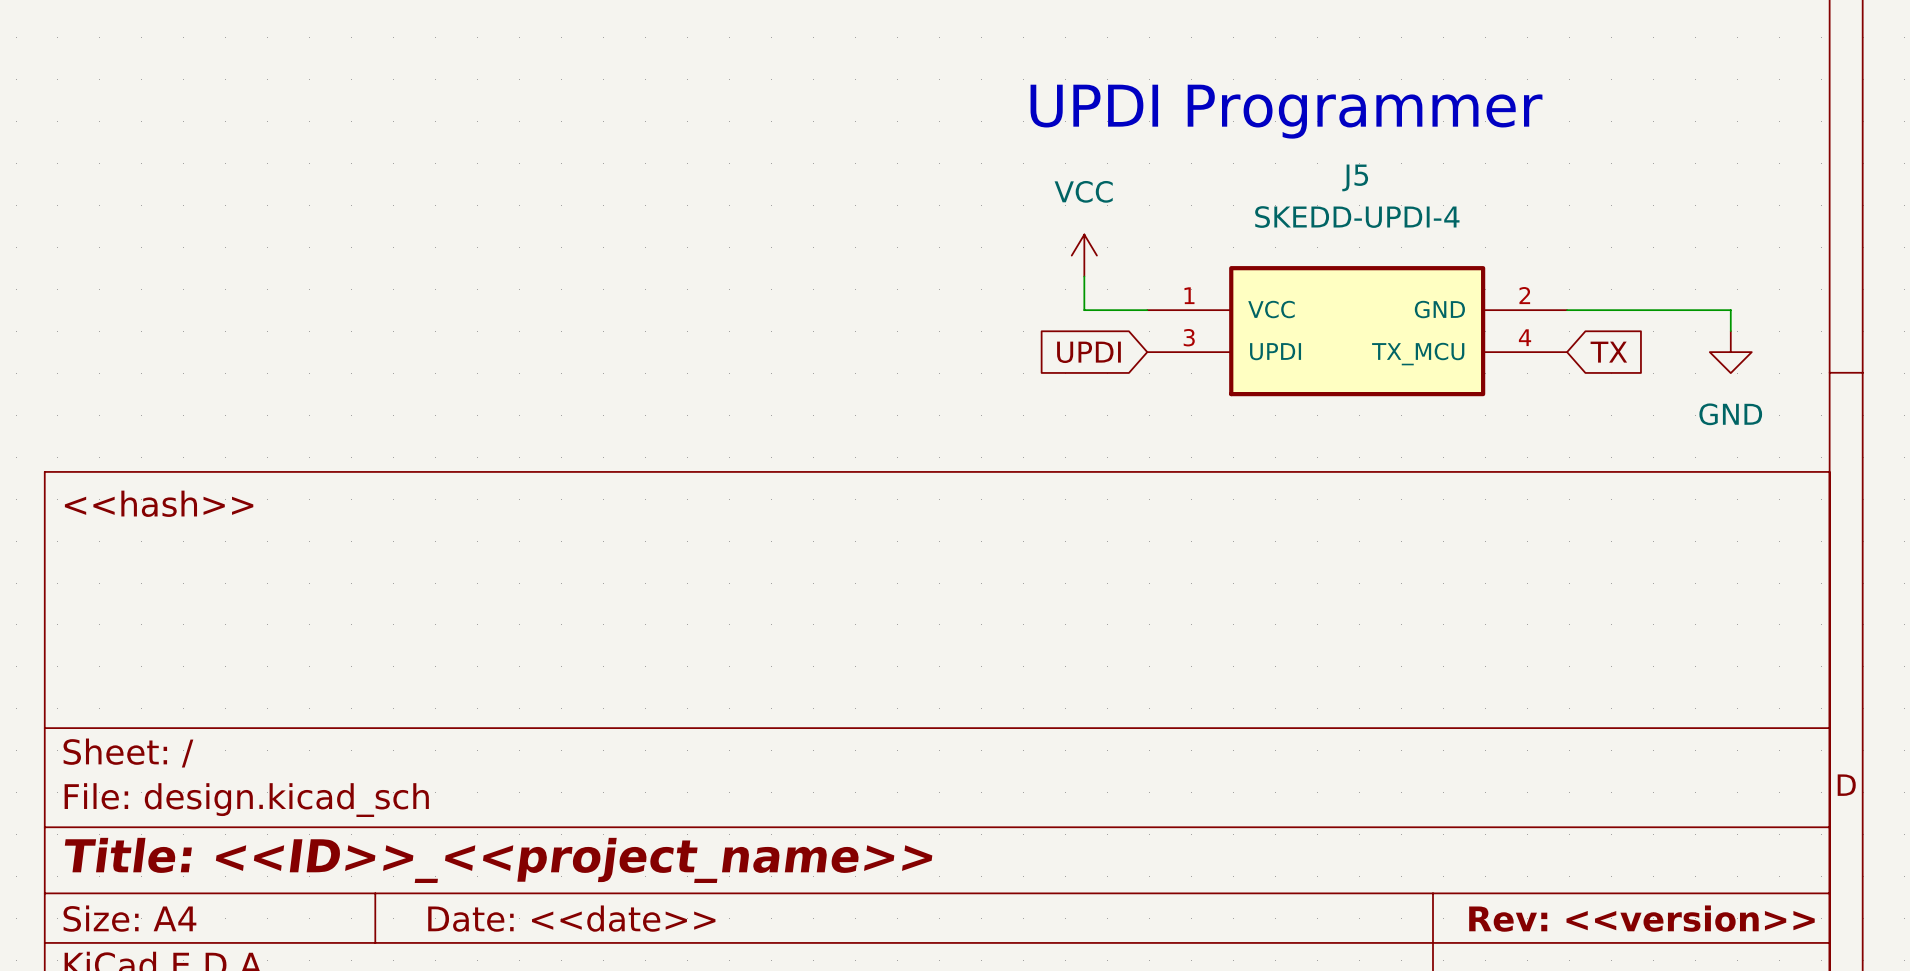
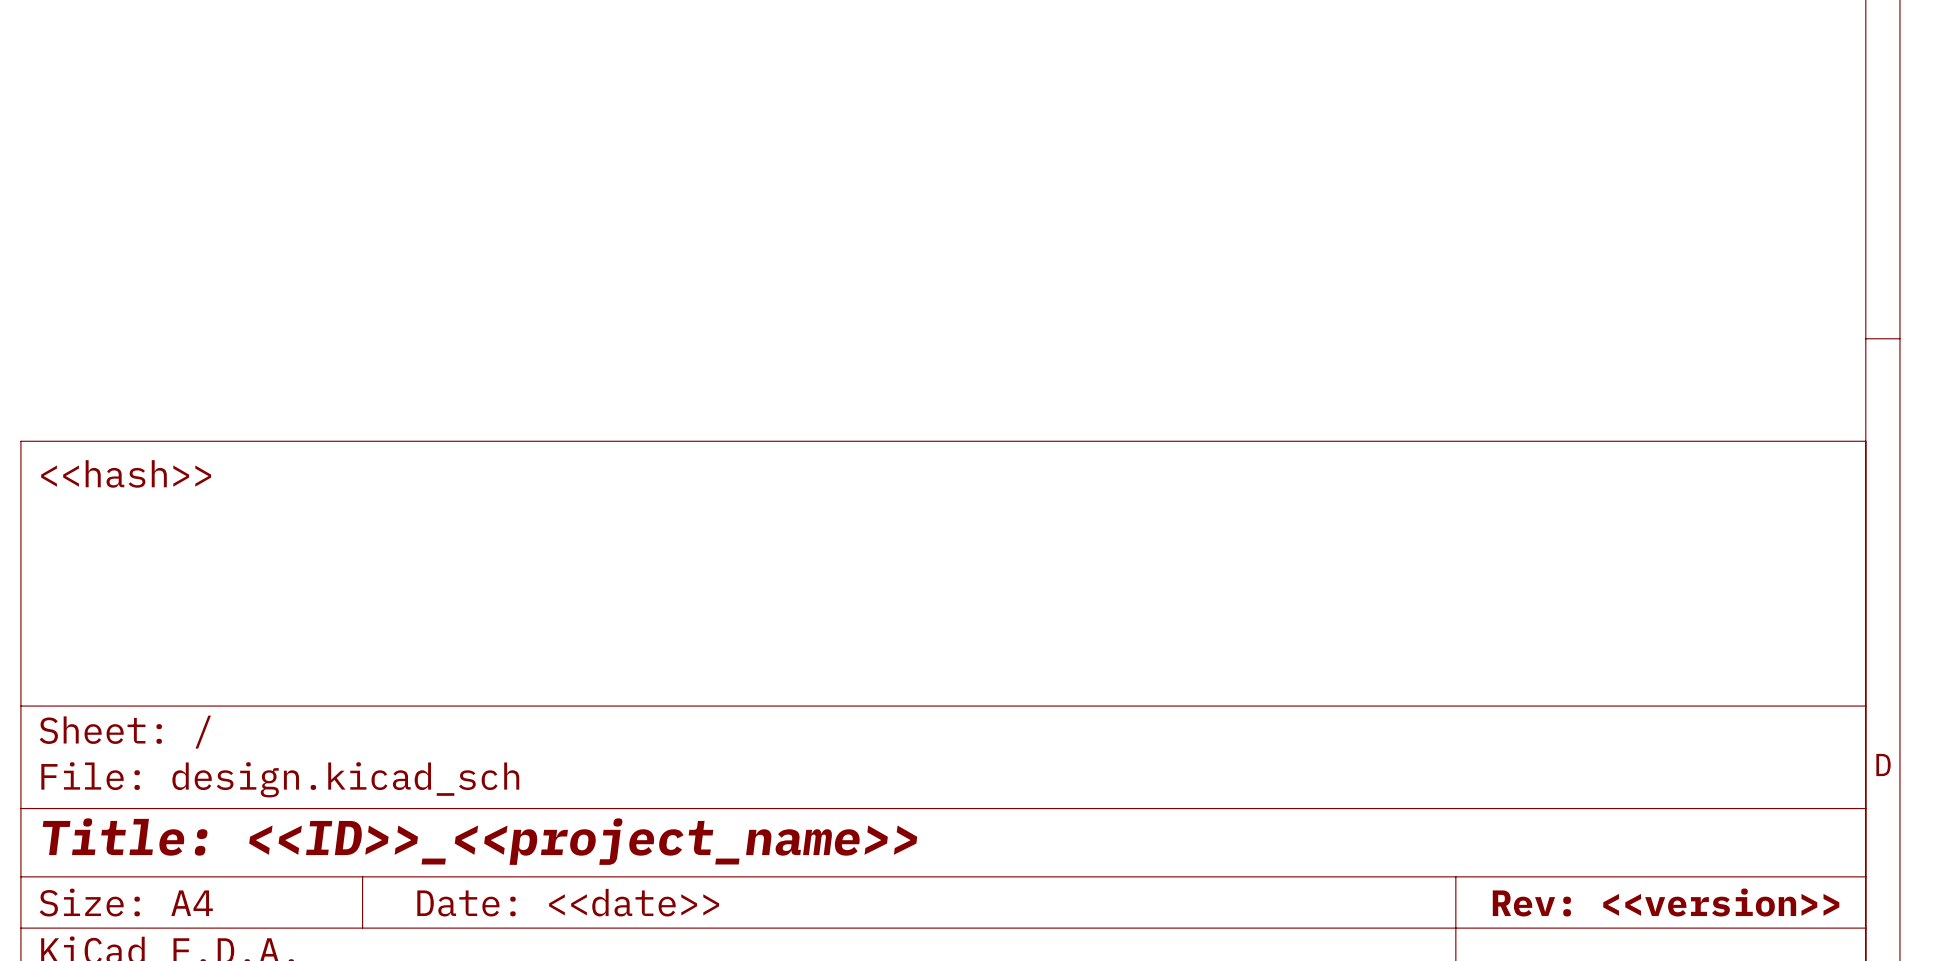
text: UPDI Programmer (1286, 111) -> none
power symbol: VCC (1084, 255) -> none
wire: (1084, 276) (1084, 310) (1147, 310) -> none
wire: (1567, 310) (1730, 310) (1730, 331) -> none
J5: SKEDD-UPDI-4 (1357, 331) -> none
global label: UPDI (1088, 352) -> none
global label: TX (1608, 352) -> none
power symbol: GND (1730, 352) -> none

